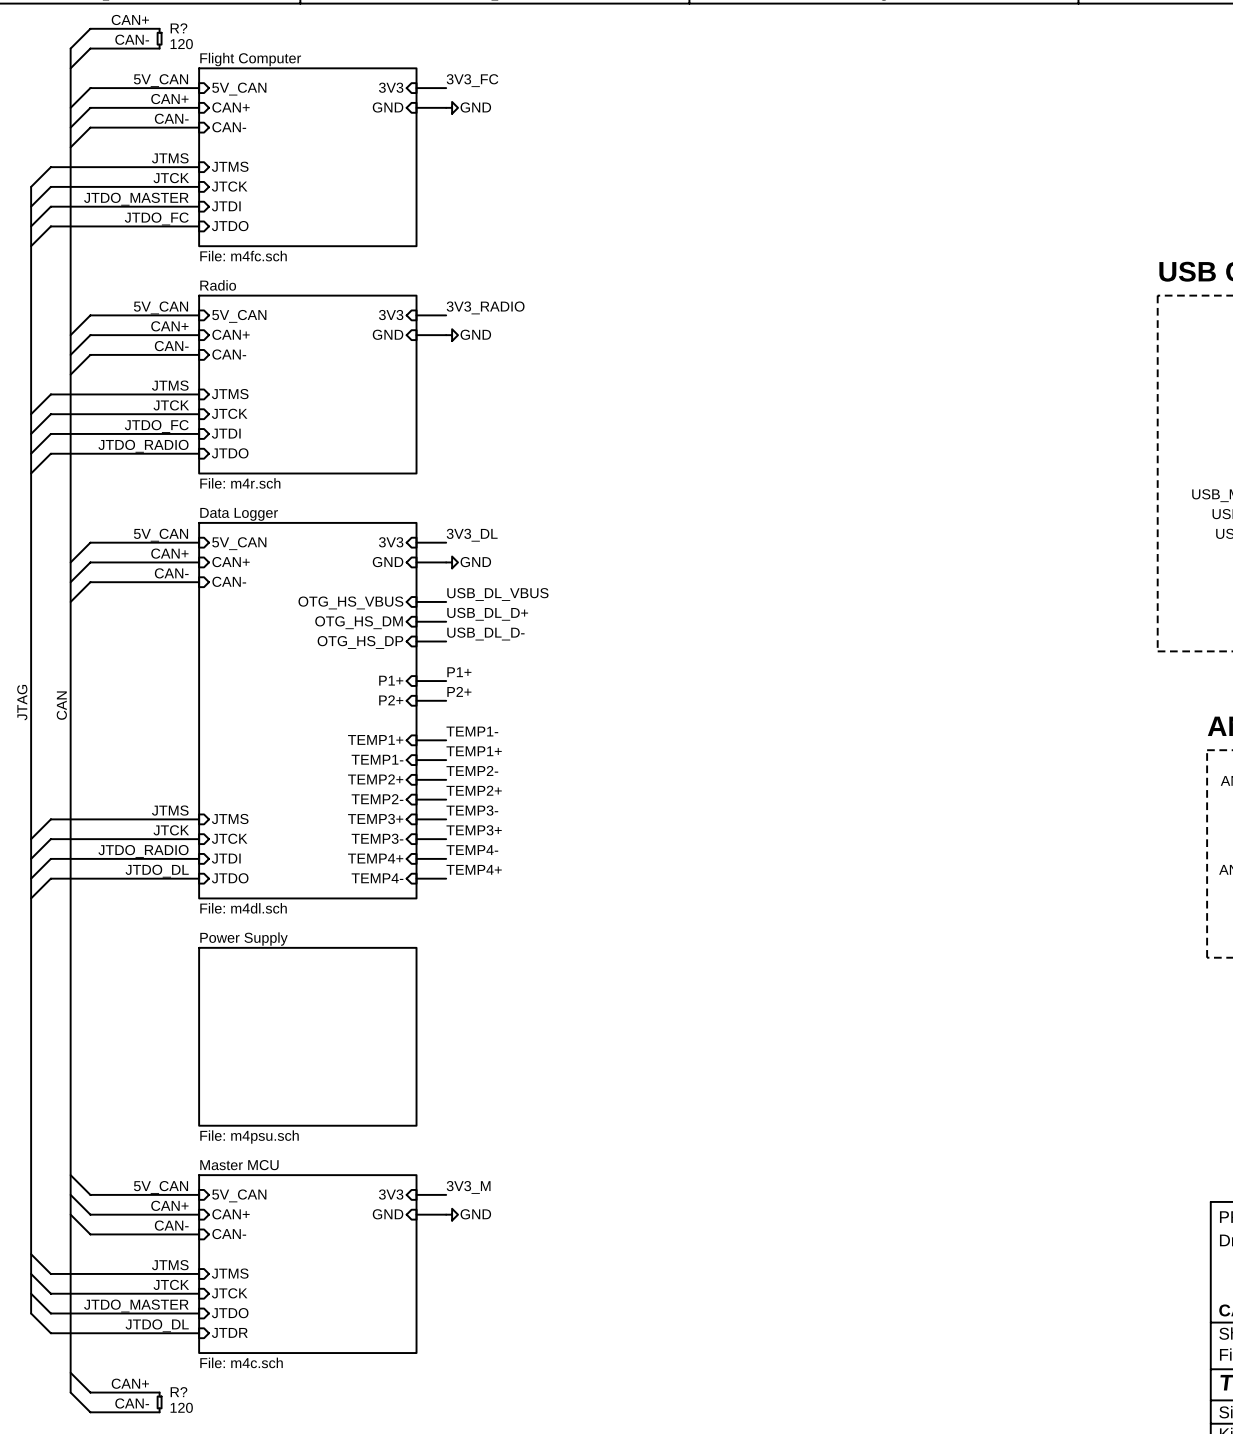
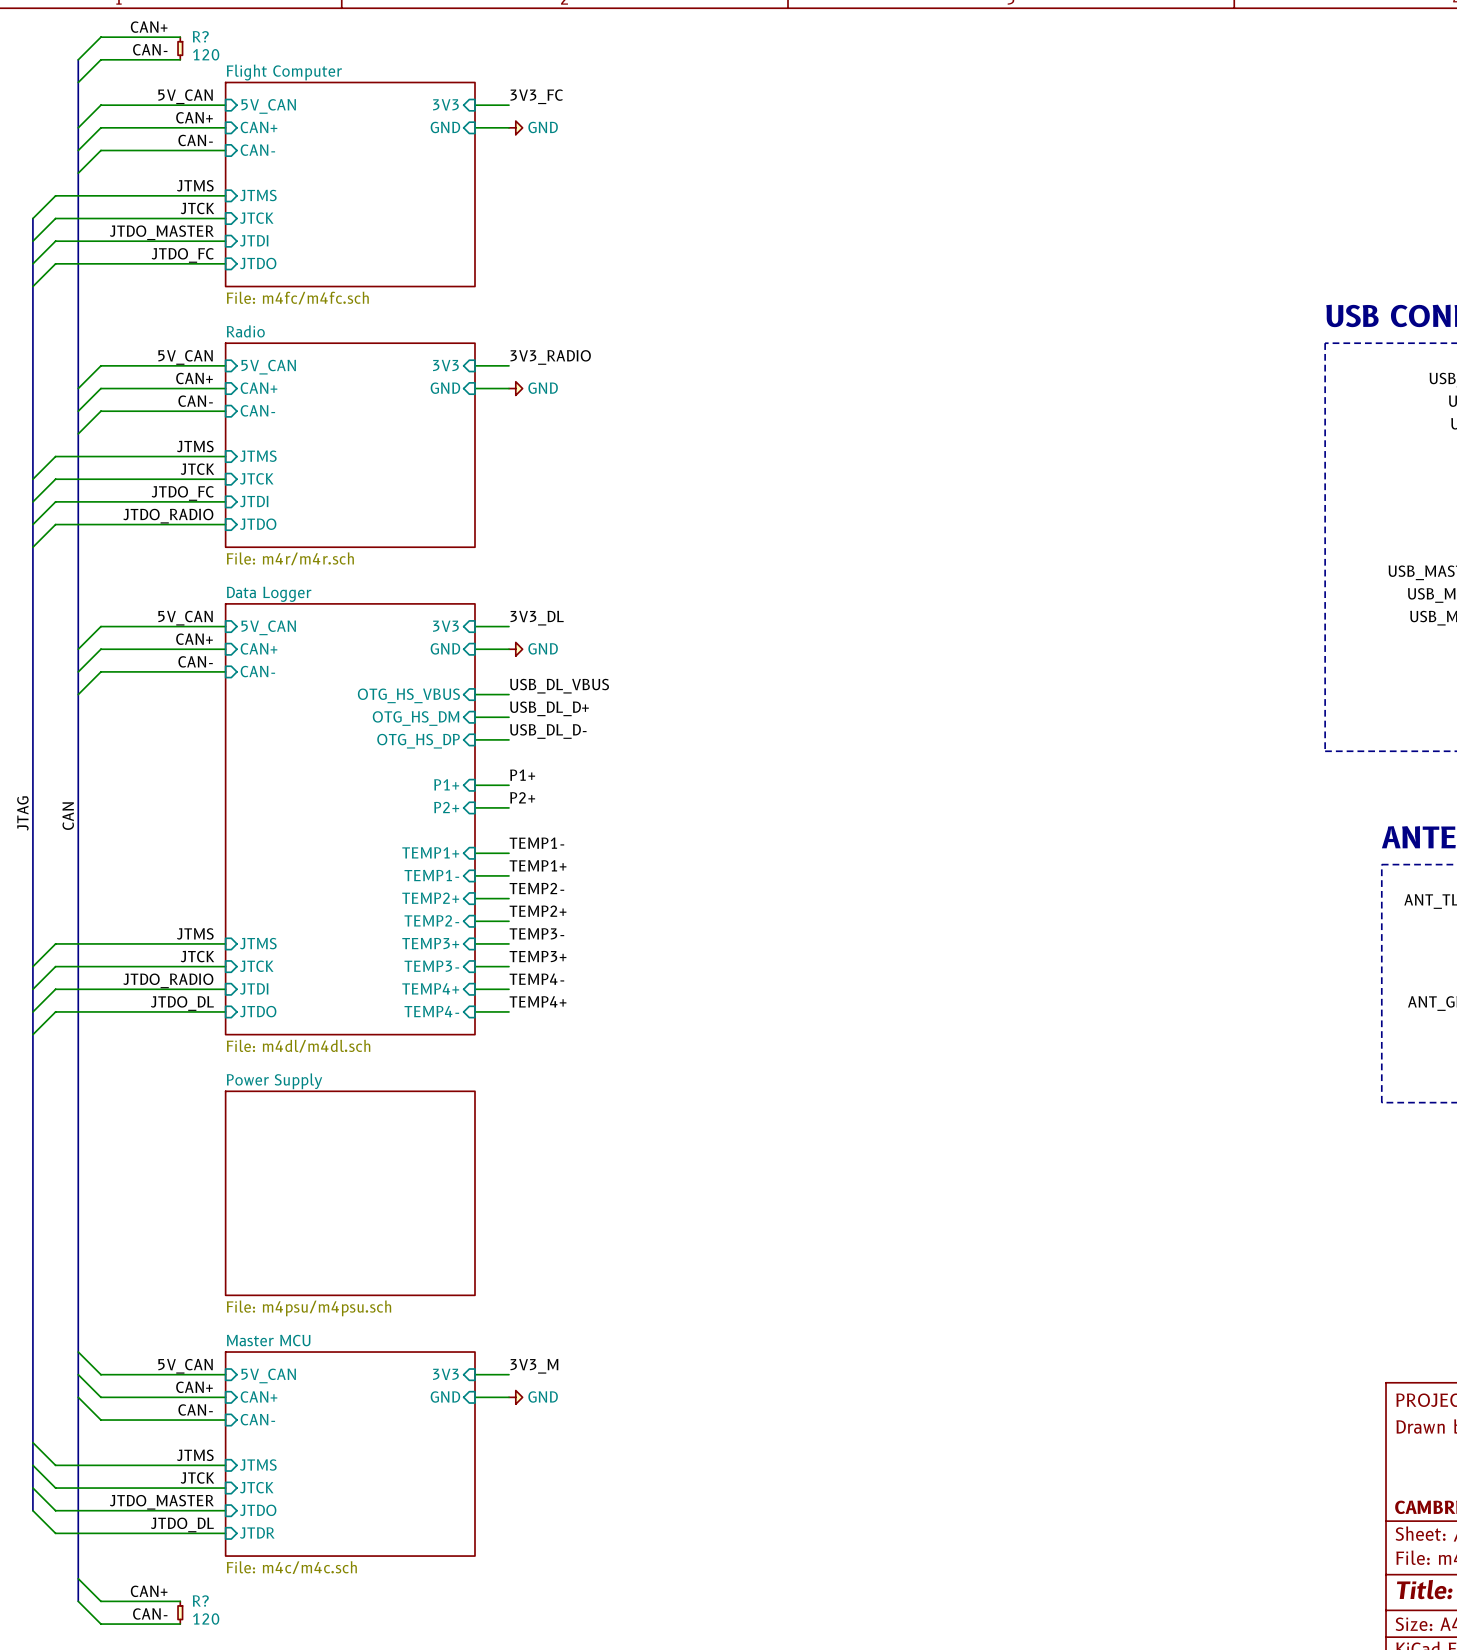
sheet Flight Computer value: File: m4fc.sch (243, 256) -> File: m4fc/m4fc.sch (297, 298)
sheet Radio value: File: m4r.sch (240, 483) -> File: m4r/m4r.sch (290, 558)
sheet Data Logger value: File: m4dl.sch (243, 908) -> File: m4dl/m4dl.sch (298, 1046)
sheet Power Supply value: File: m4psu.sch (249, 1137) -> File: m4psu/m4psu.sch (309, 1308)
sheet Master MCU value: File: m4c.sch (241, 1362) -> File: m4c/m4c.sch (291, 1567)

